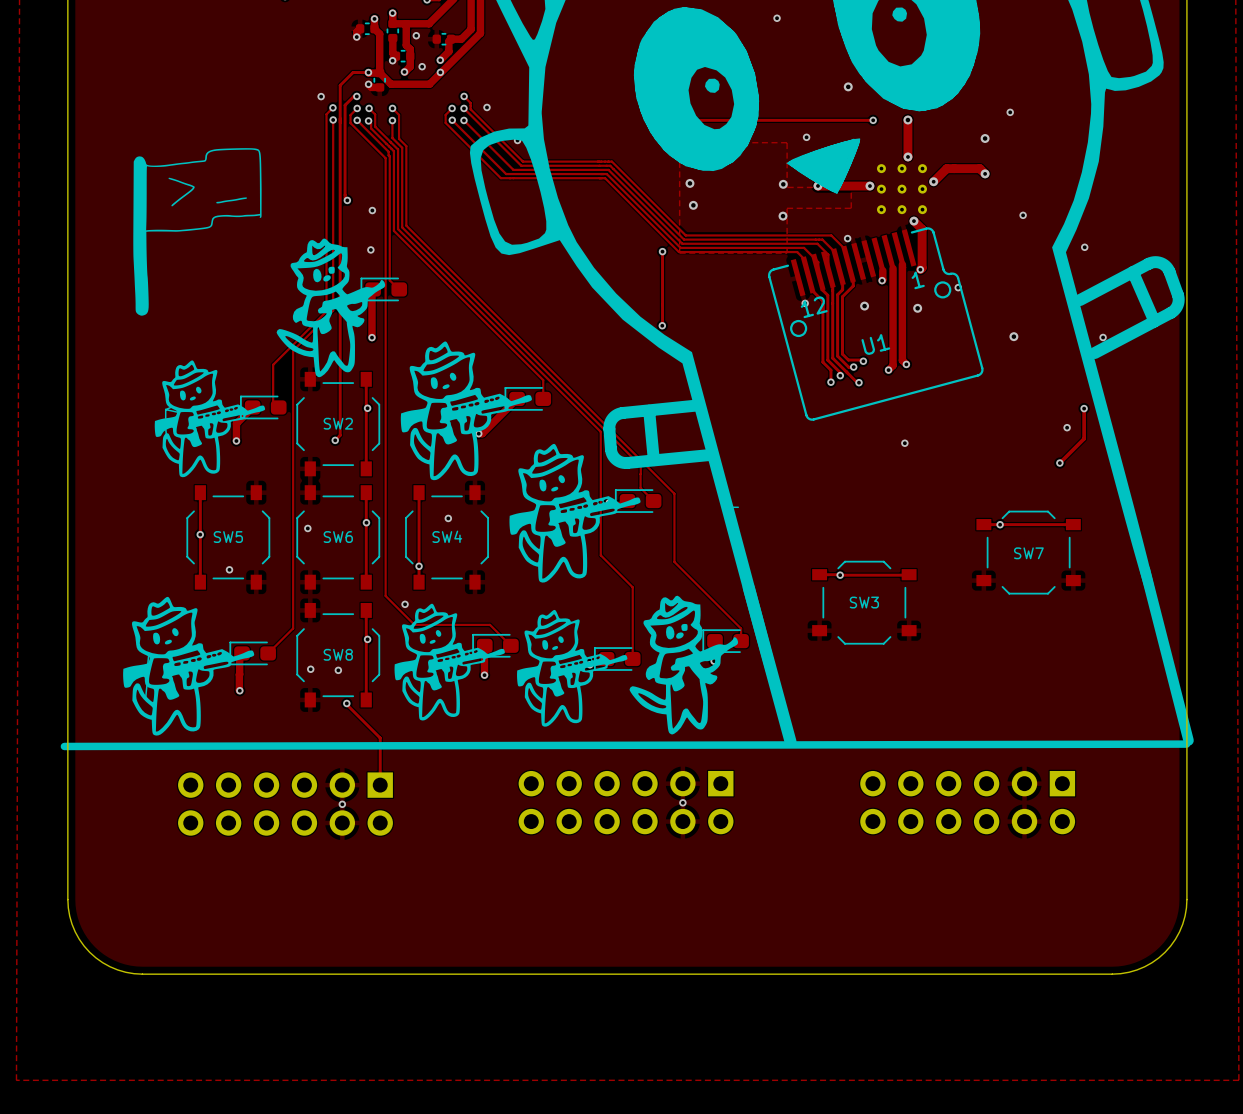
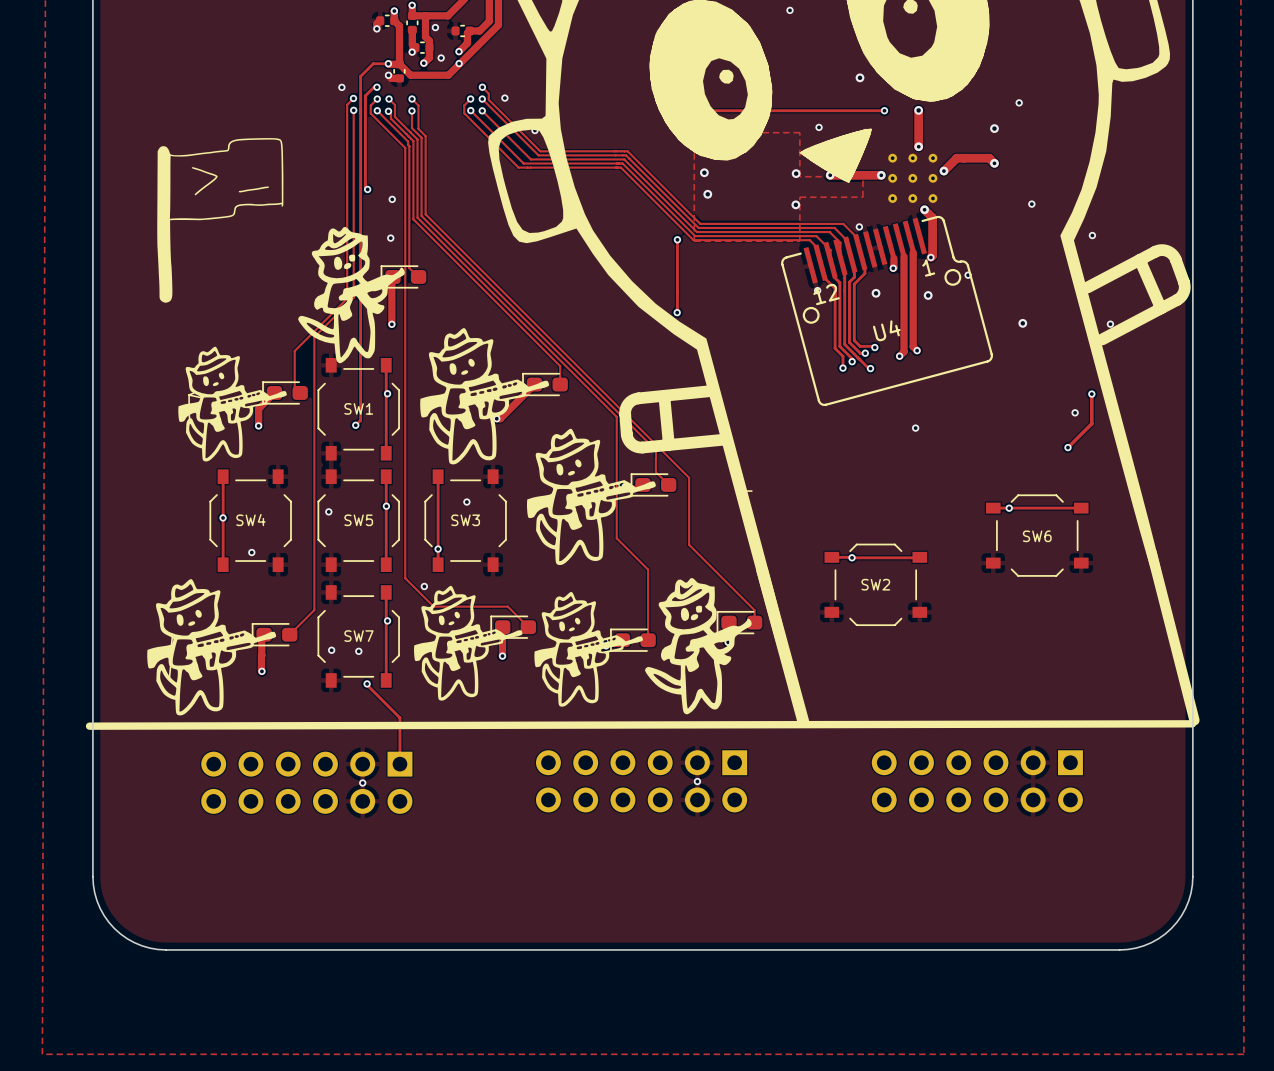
U1 name: U1 (875, 344) -> U4 (886, 330)
SW2 name: SW2 (338, 423) -> SW1 (358, 408)
SW4 name: SW4 (447, 536) -> SW3 (465, 520)
SW5 name: SW5 (228, 537) -> SW4 (250, 520)
SW6 name: SW6 (338, 537) -> SW5 (358, 520)
SW7 name: SW7 (1028, 553) -> SW6 (1037, 536)
SW3 name: SW3 (864, 602) -> SW2 (875, 584)
SW8 name: SW8 (338, 654) -> SW7 (358, 636)

